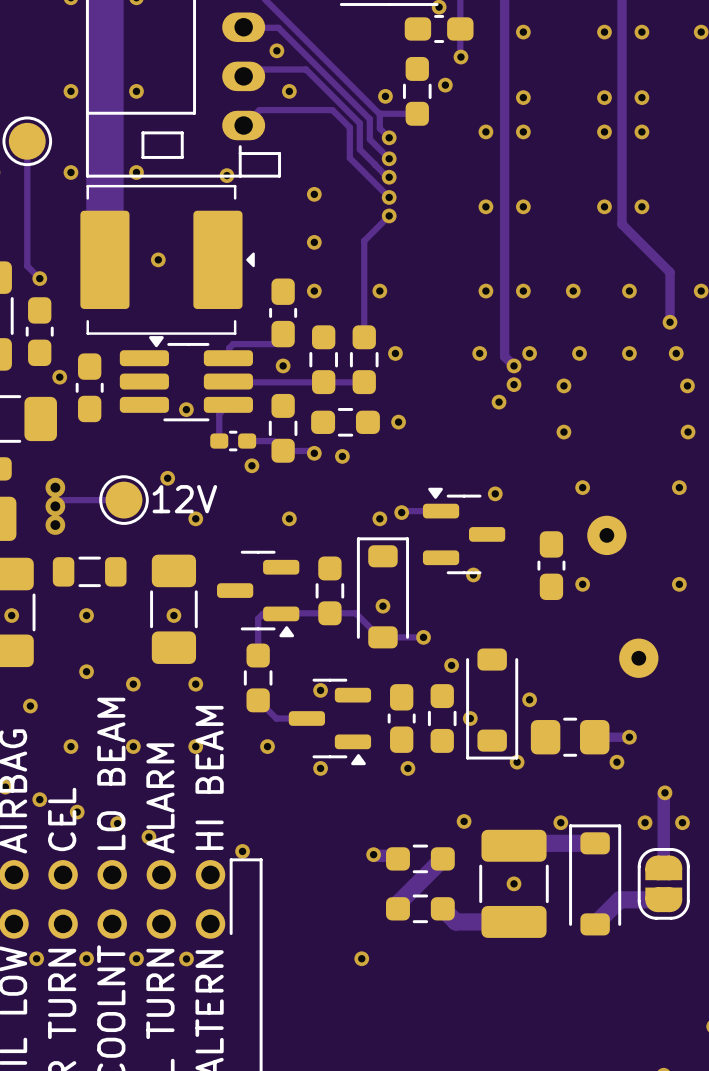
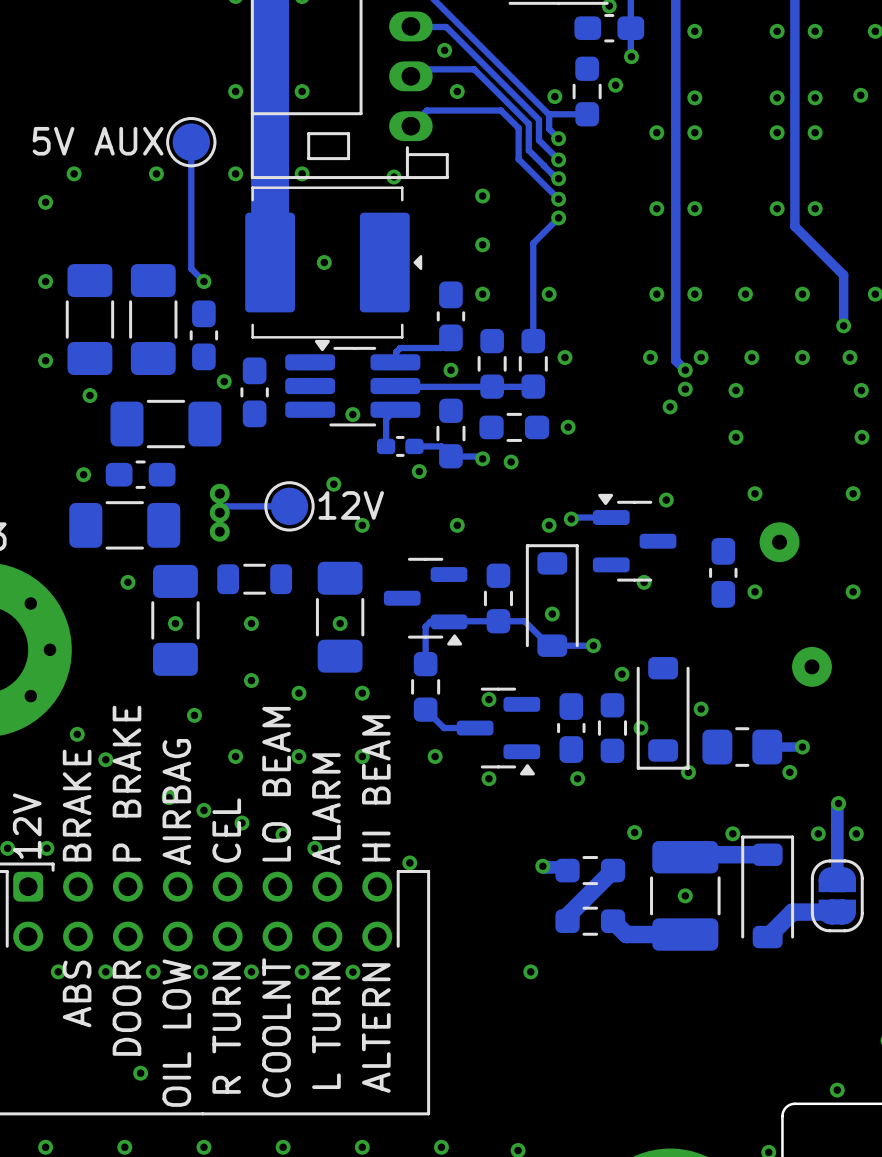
via: none -> (860, 95)

